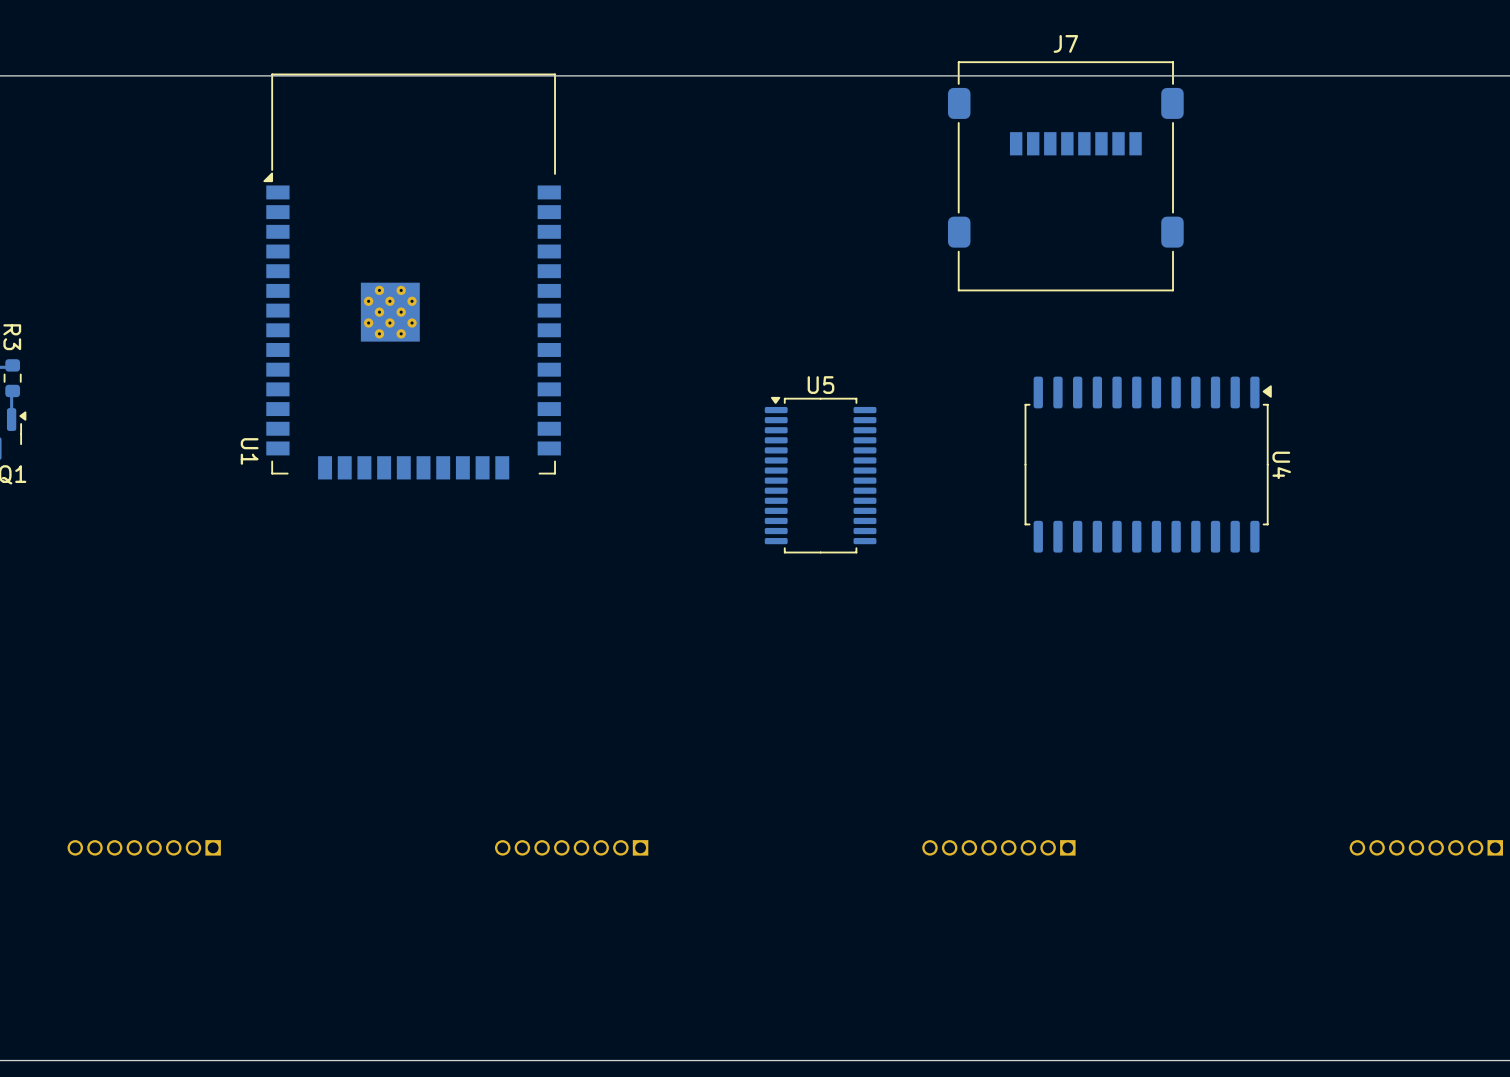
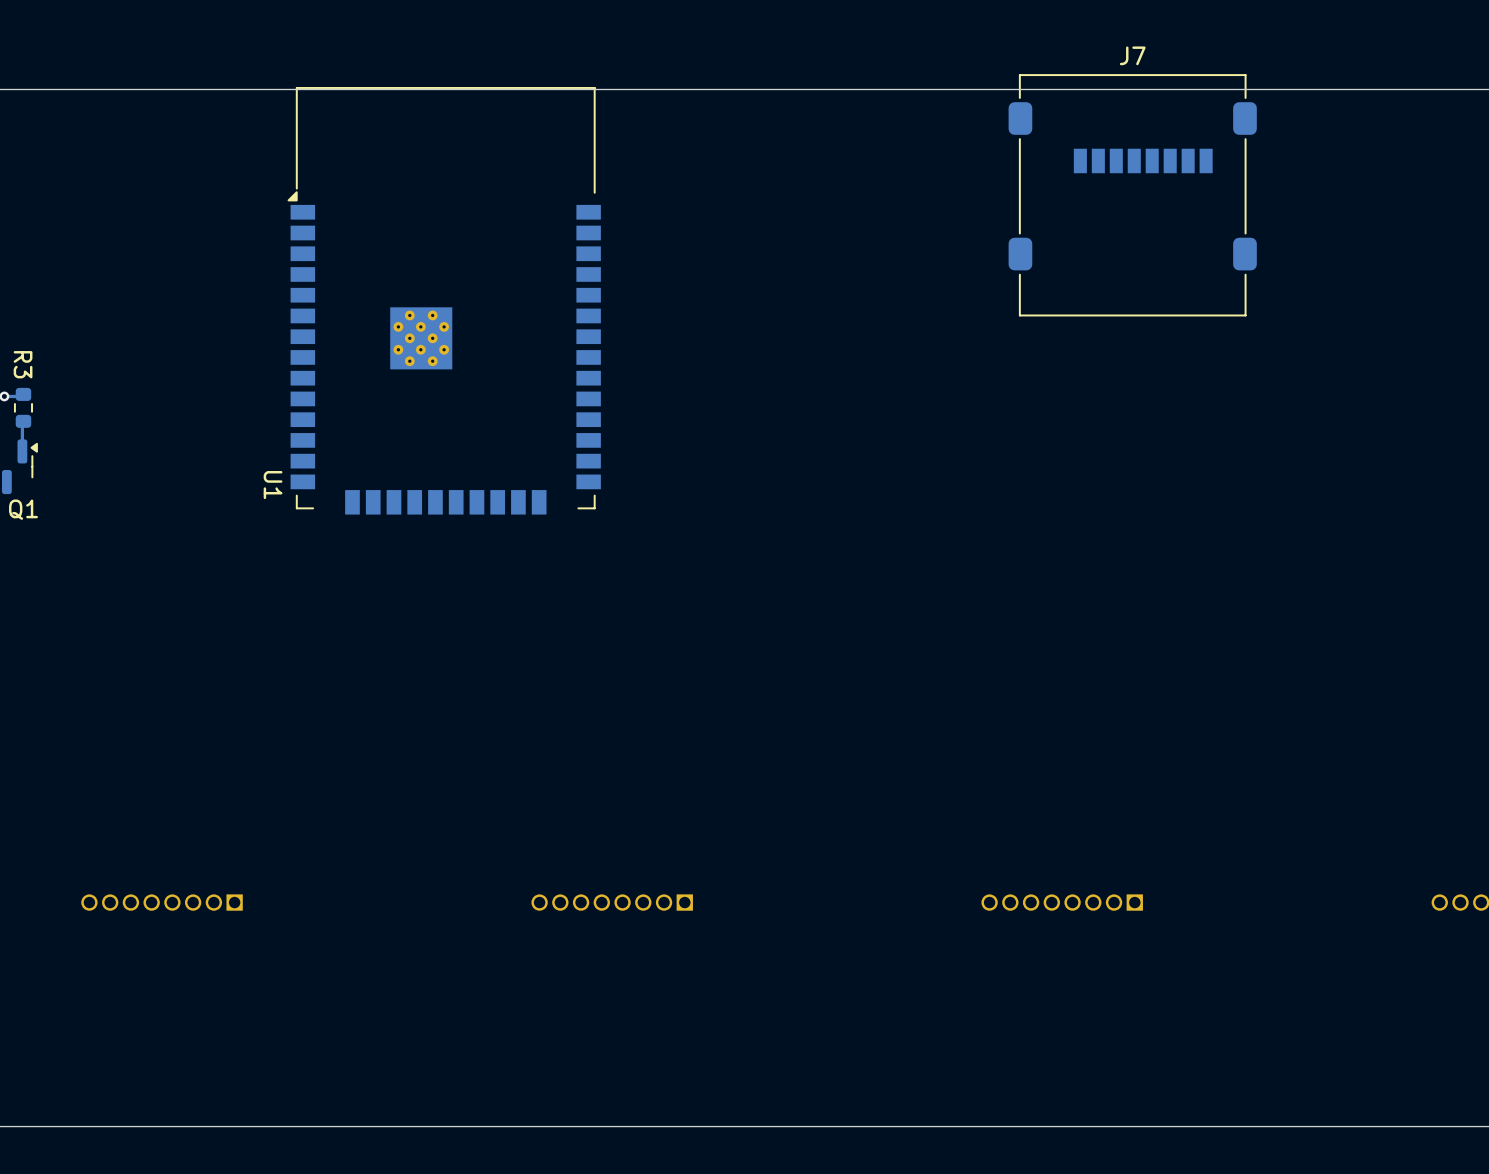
U4: (1148, 464) -> none
U5: (820, 475) -> none

